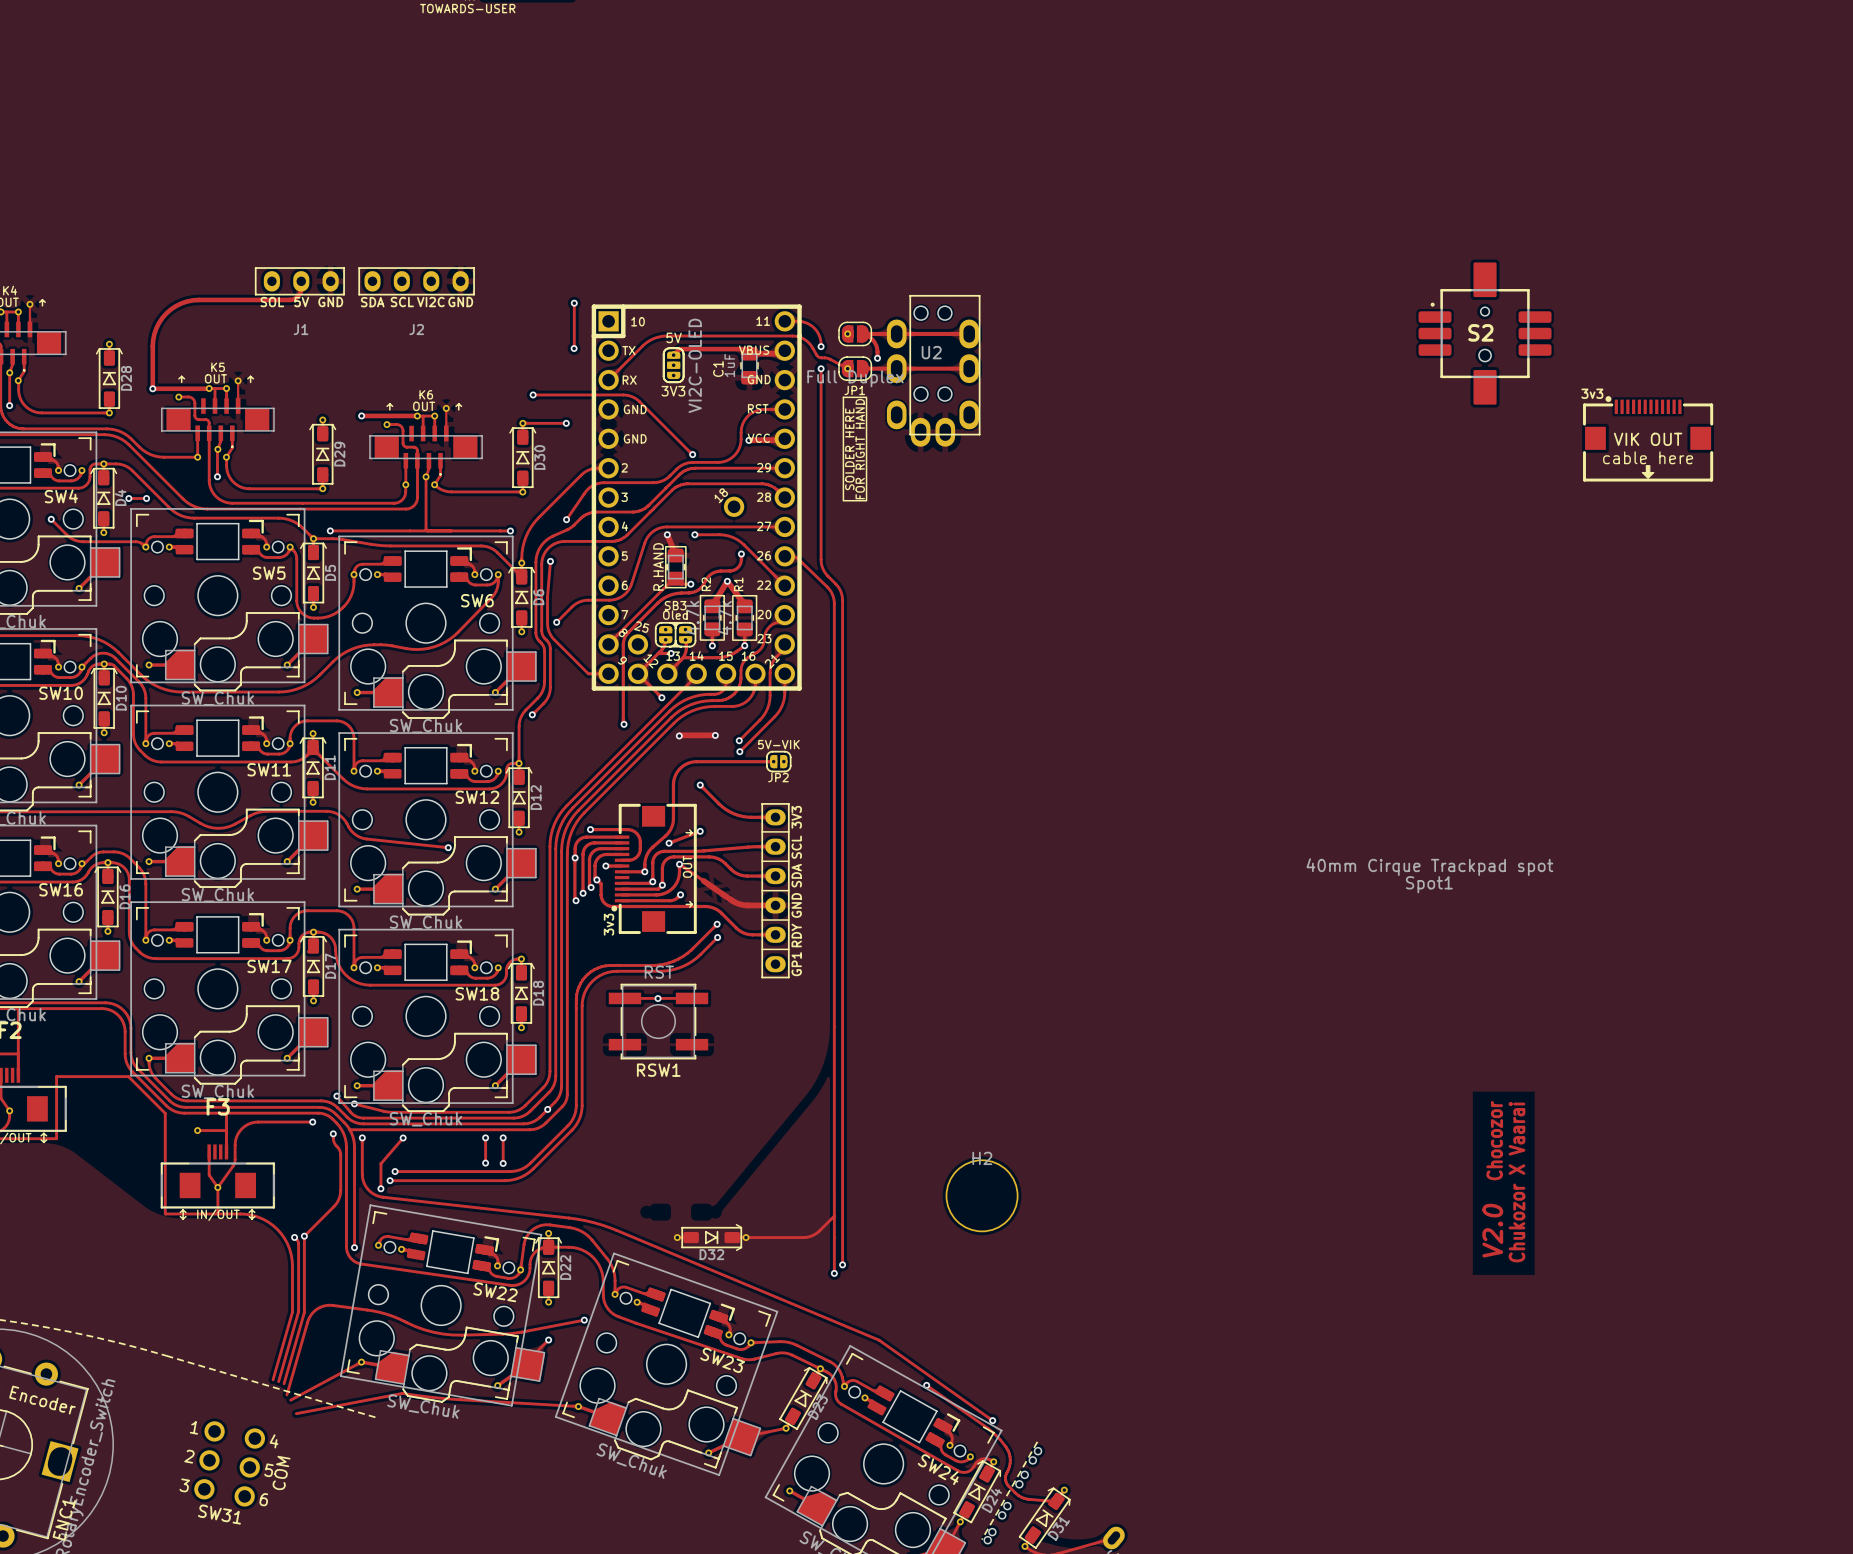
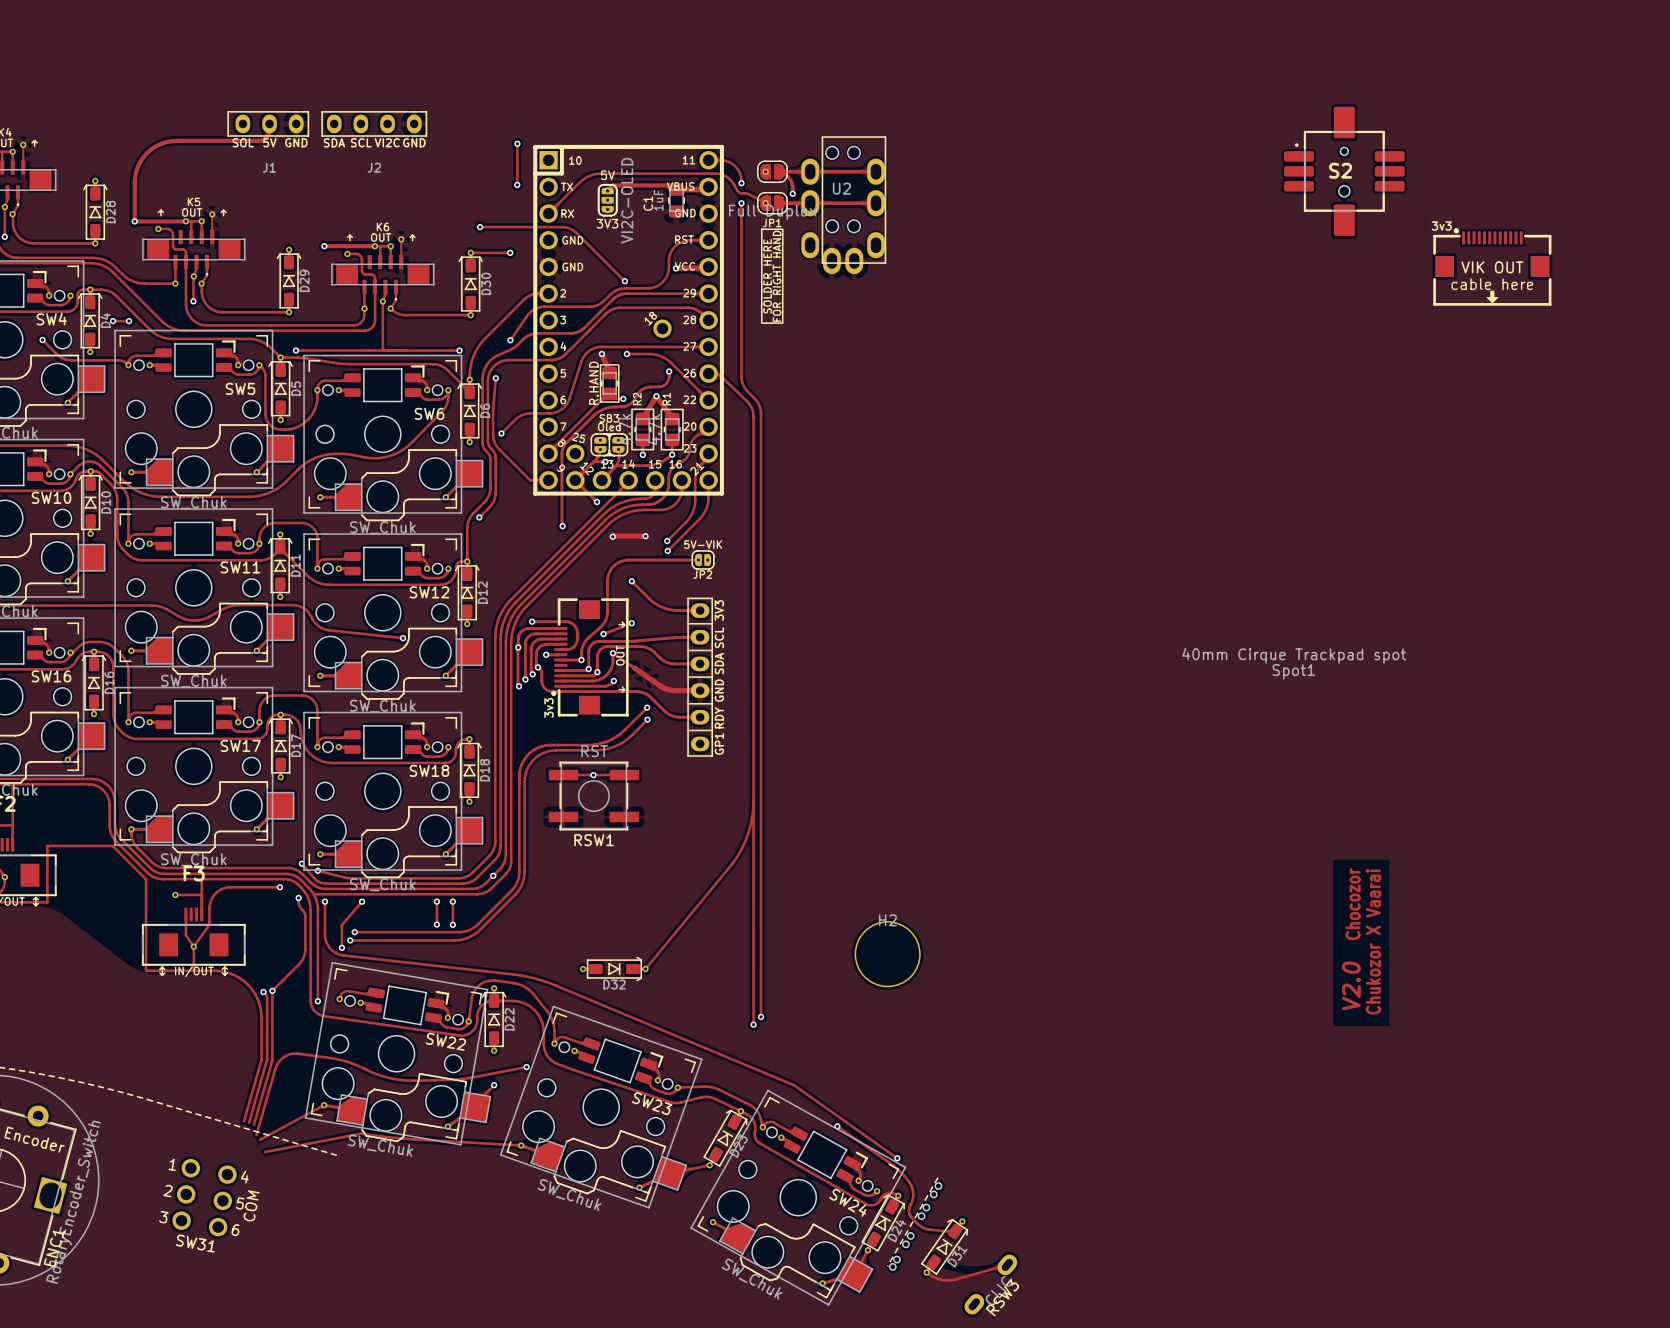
track: none -> (753, 800) (748, 833) (737, 856) (645, 969)
track: (834, 1216) (817, 1232) (807, 1237) (746, 1237) -> none
D32 position: (711, 1237) -> (614, 968)

